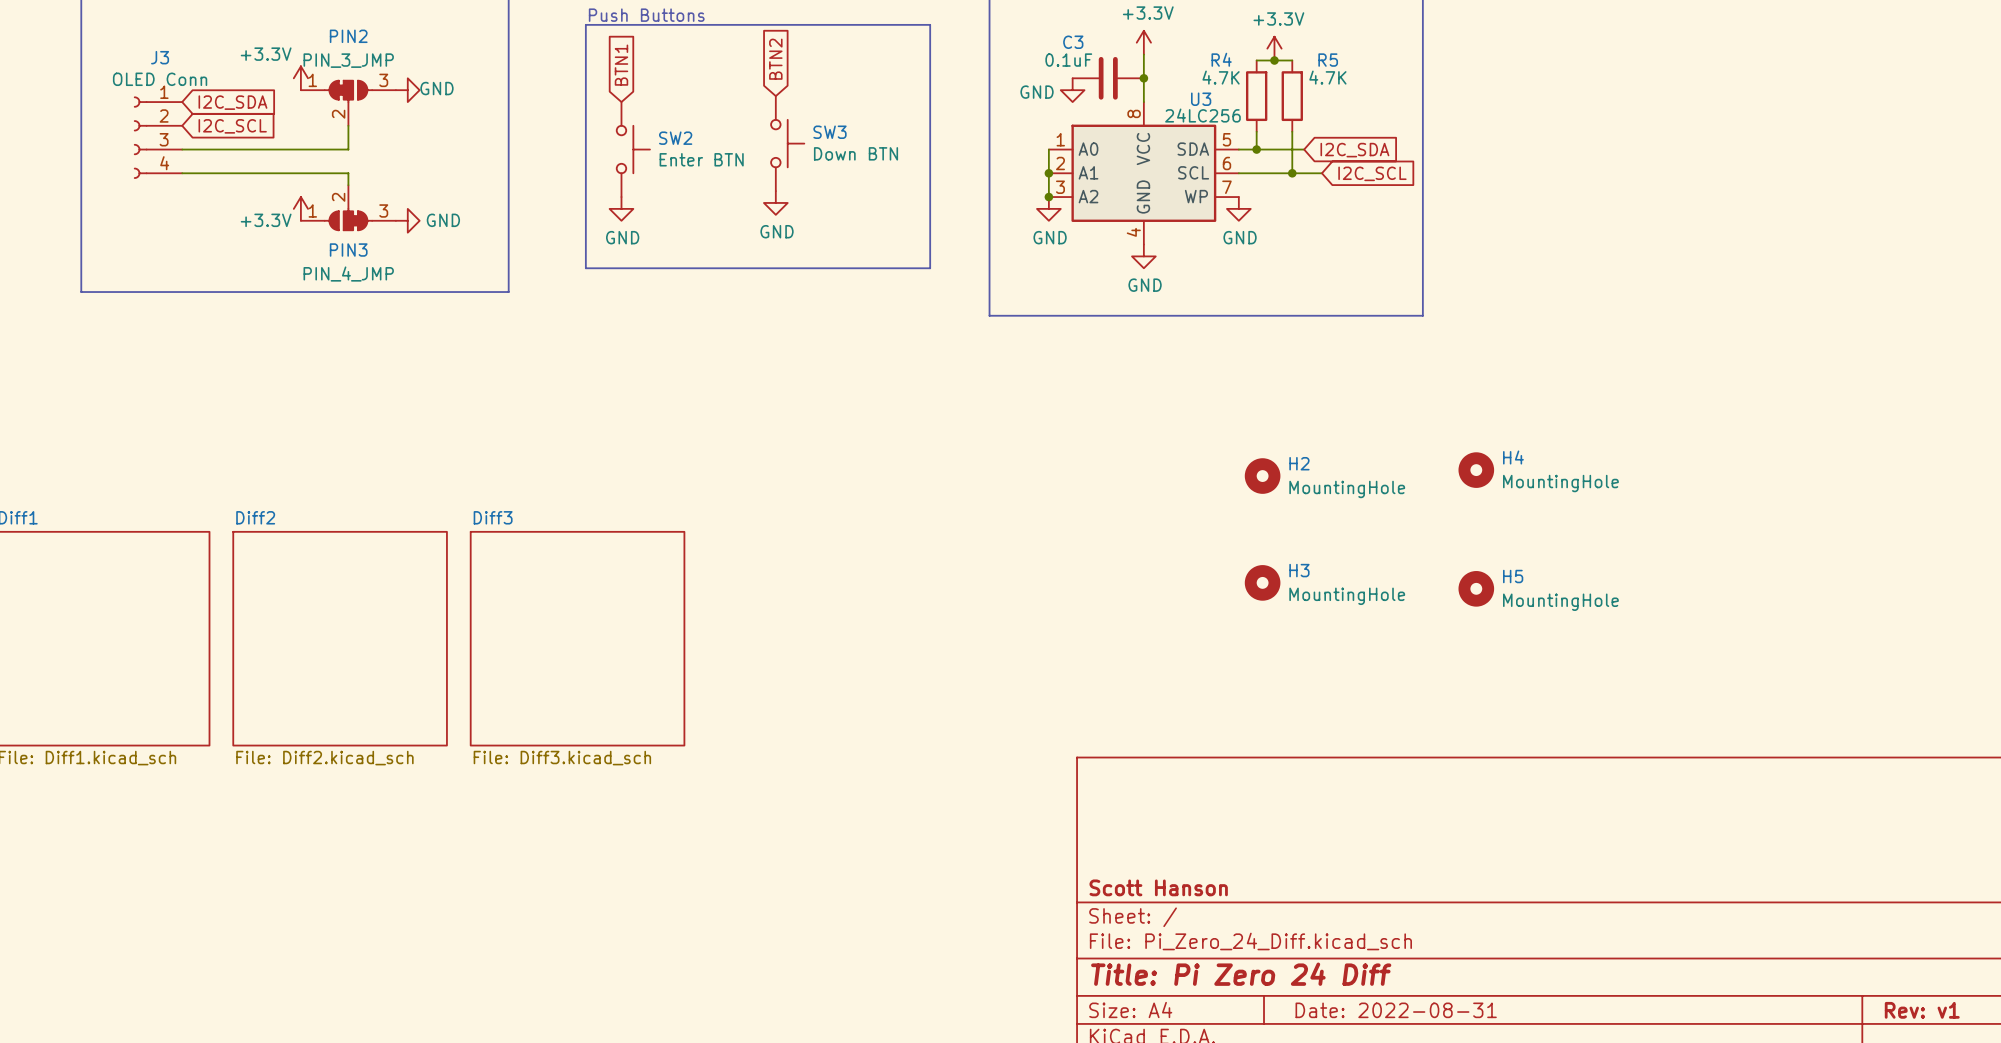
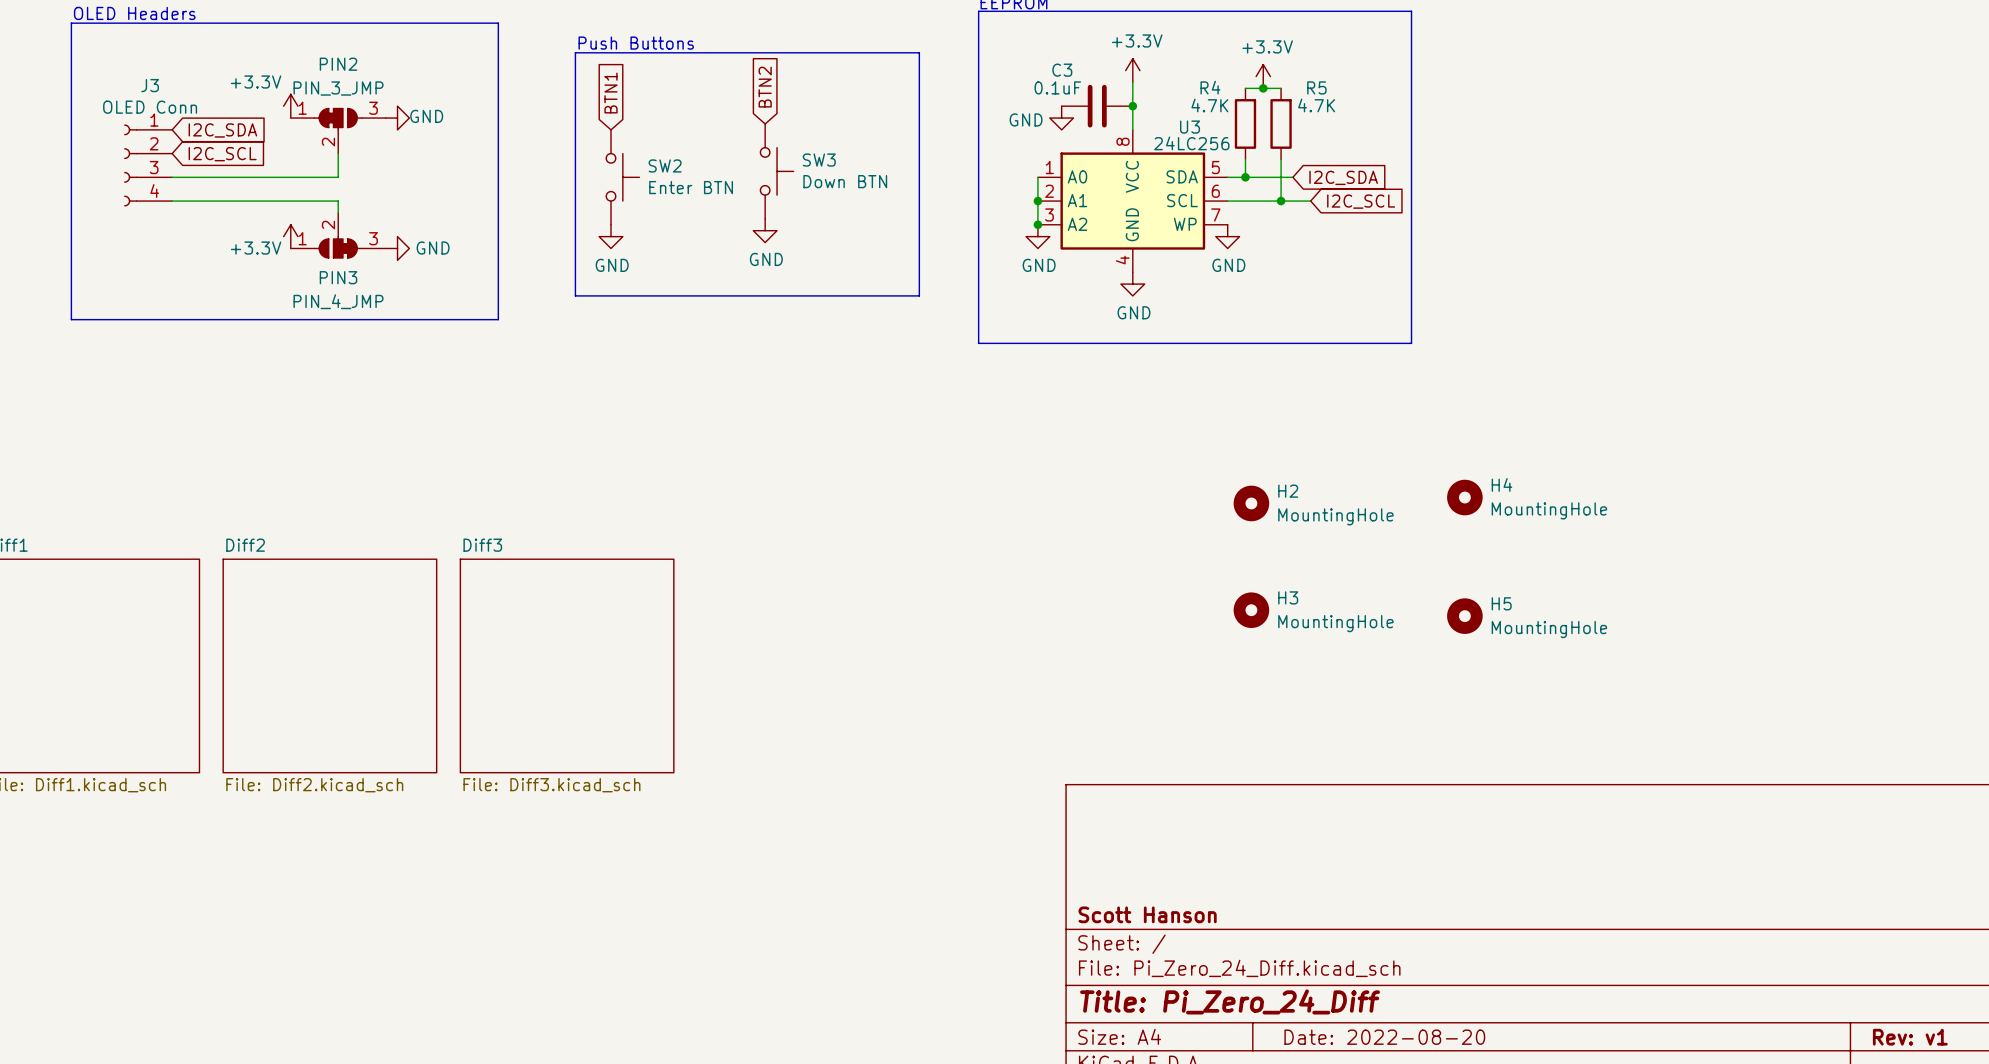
title block: Title: Pi Zero 24 Diff (1241, 974) -> Title: Pi_Zero_24_Diff (1230, 1001)
title block: Date: 2022-08-31 (1396, 1010) -> Date: 2022-08-20 (1384, 1037)

